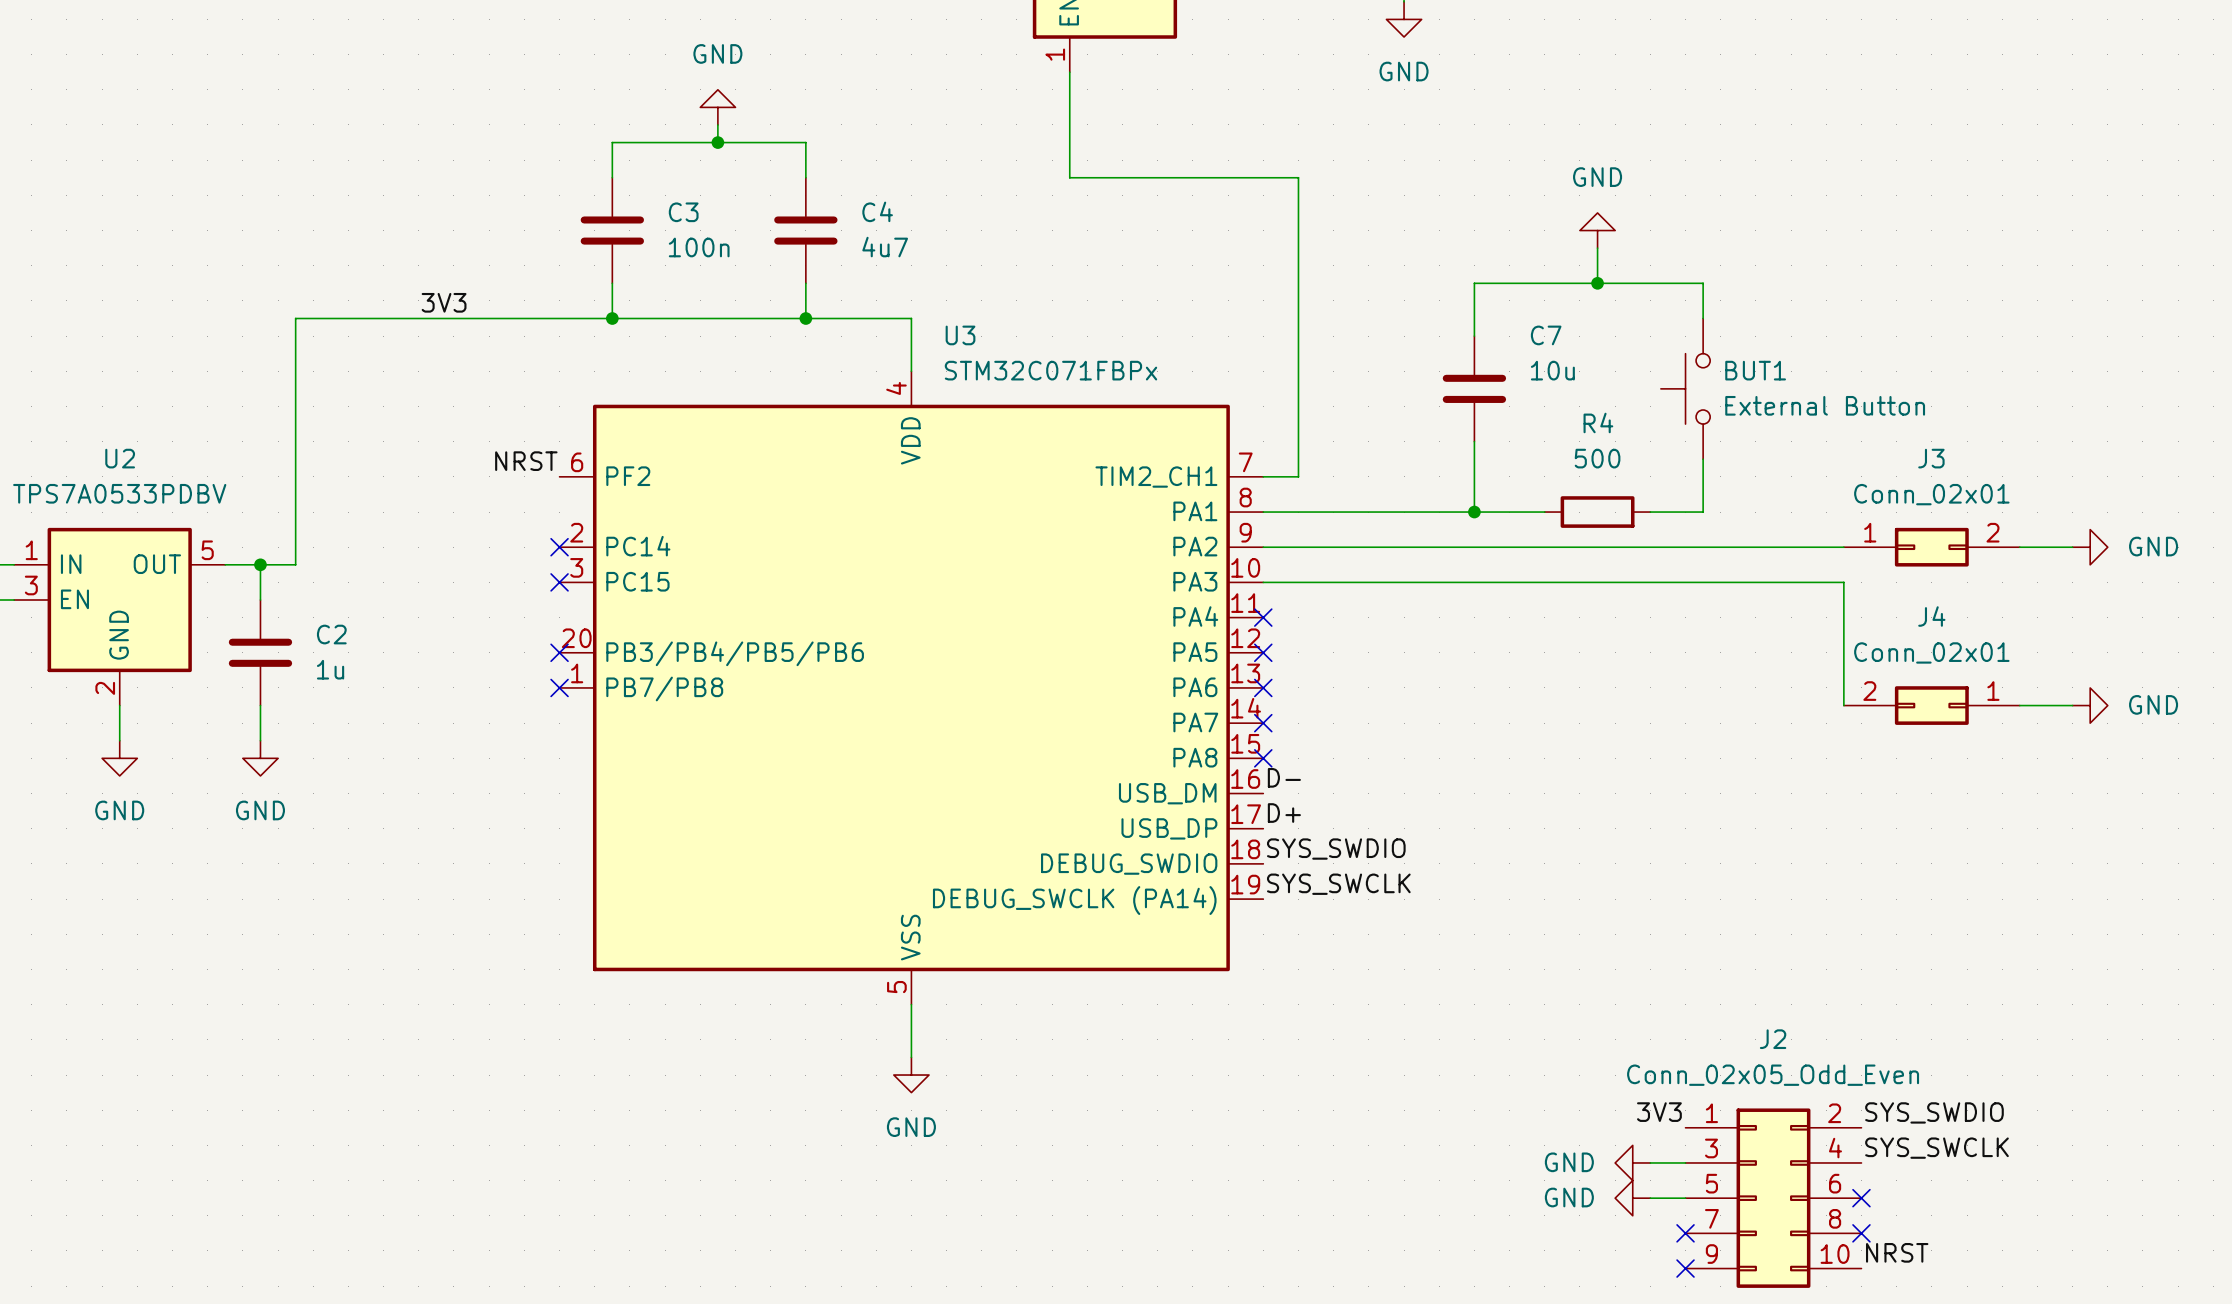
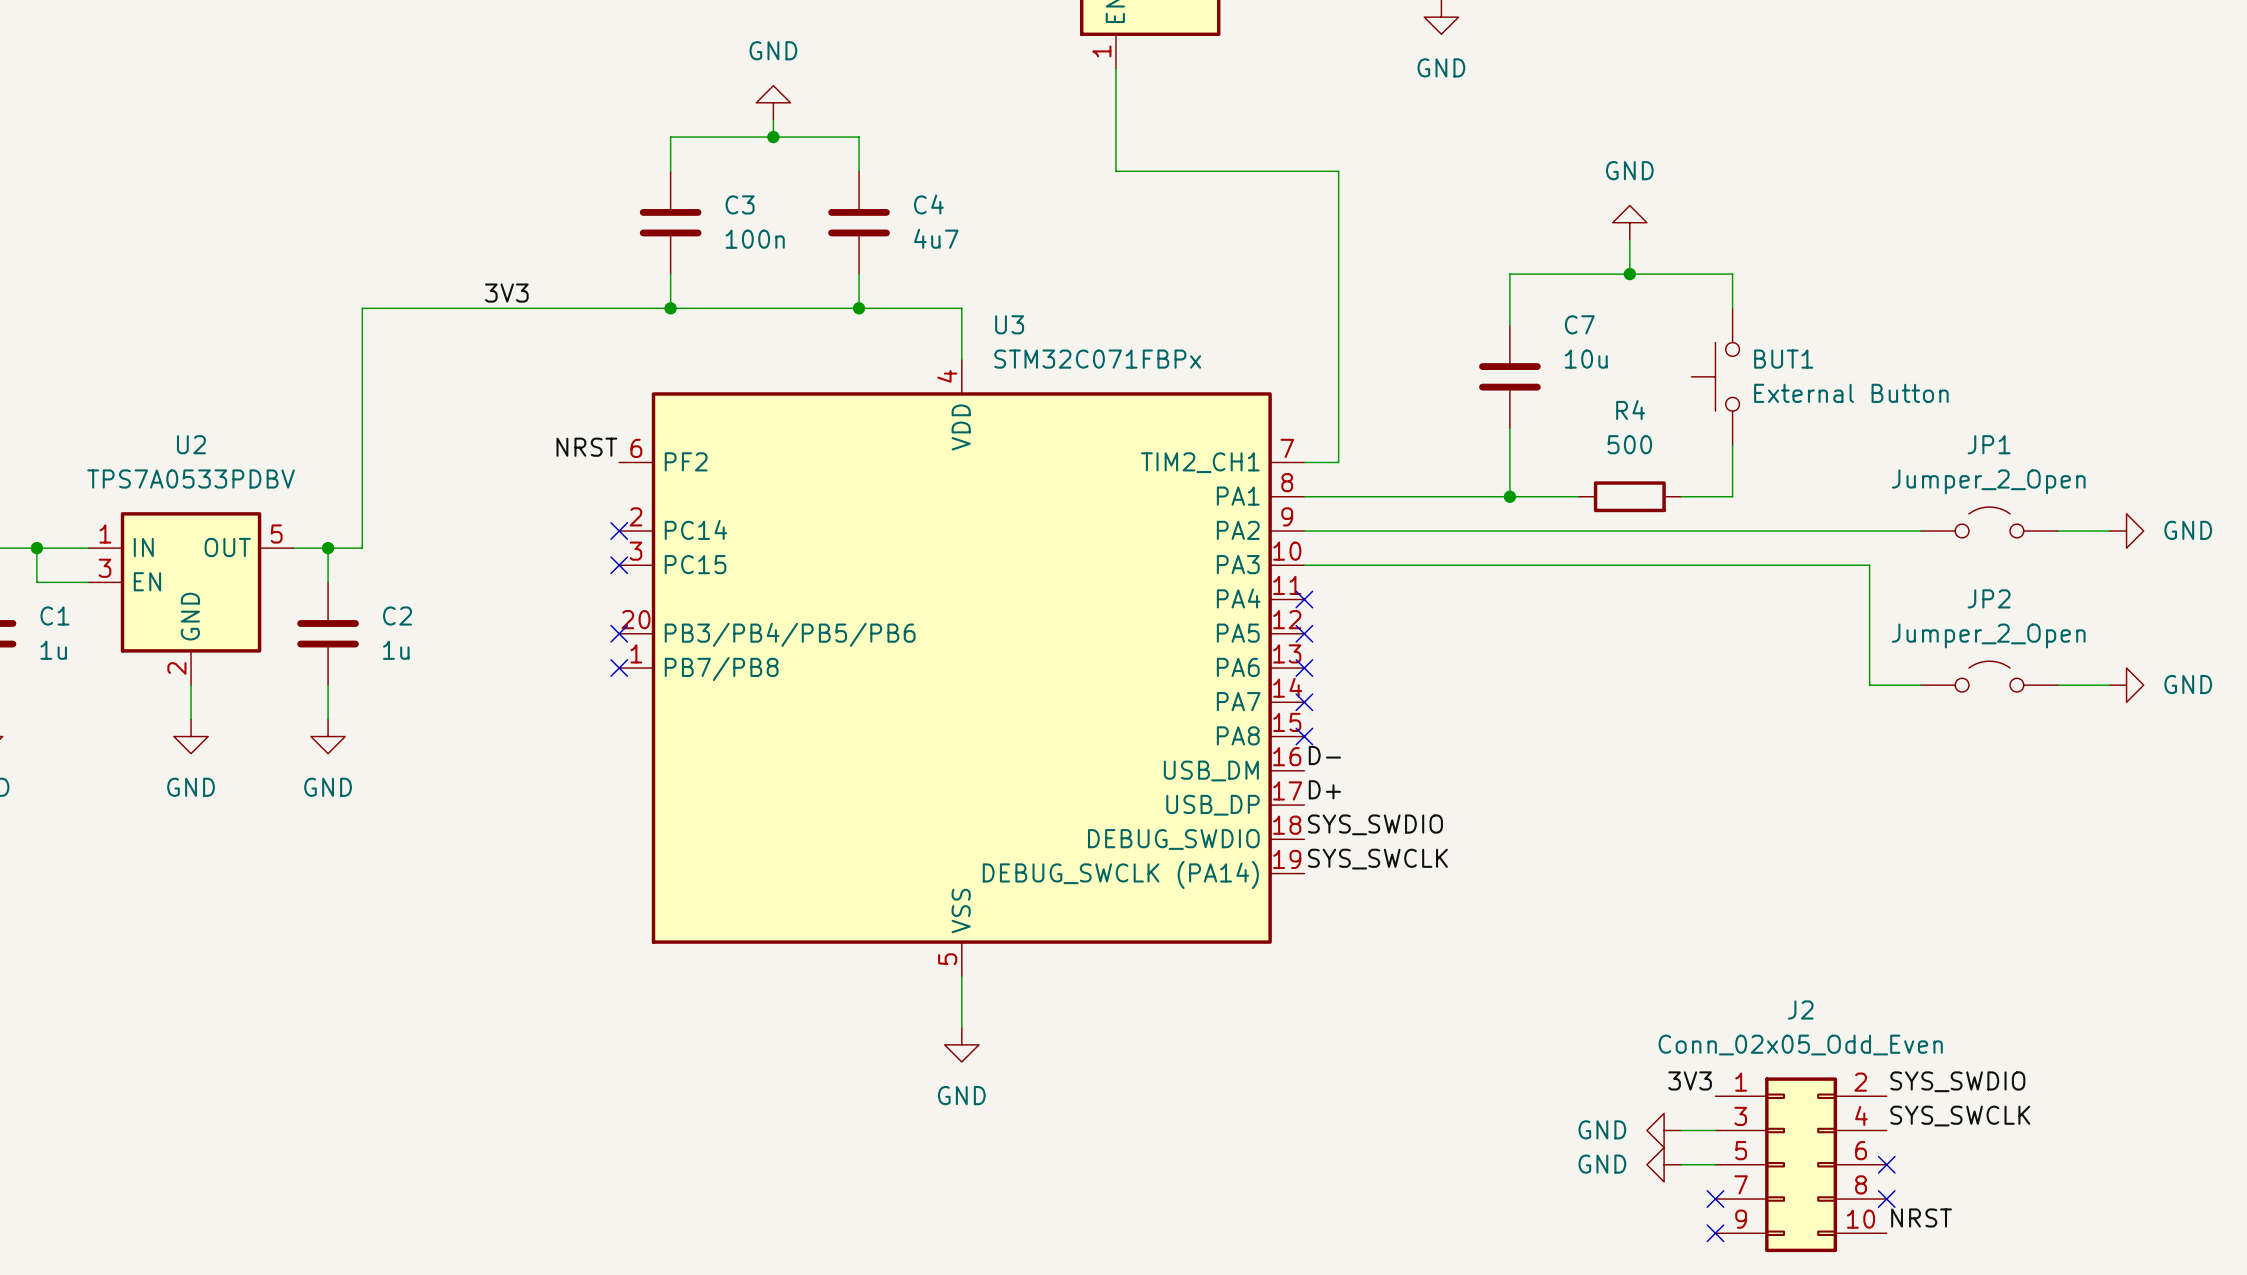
JP1: none -> Jumper_2_Open (1989, 522)
J3: Conn_02x01 (1931, 547) -> none
power symbol position: GND (2090, 547) -> GND (2126, 531)
JP2: none -> Jumper_2_Open (1989, 676)
J4: Conn_02x01 (1931, 705) -> none
power symbol position: GND (2090, 705) -> GND (2126, 685)

